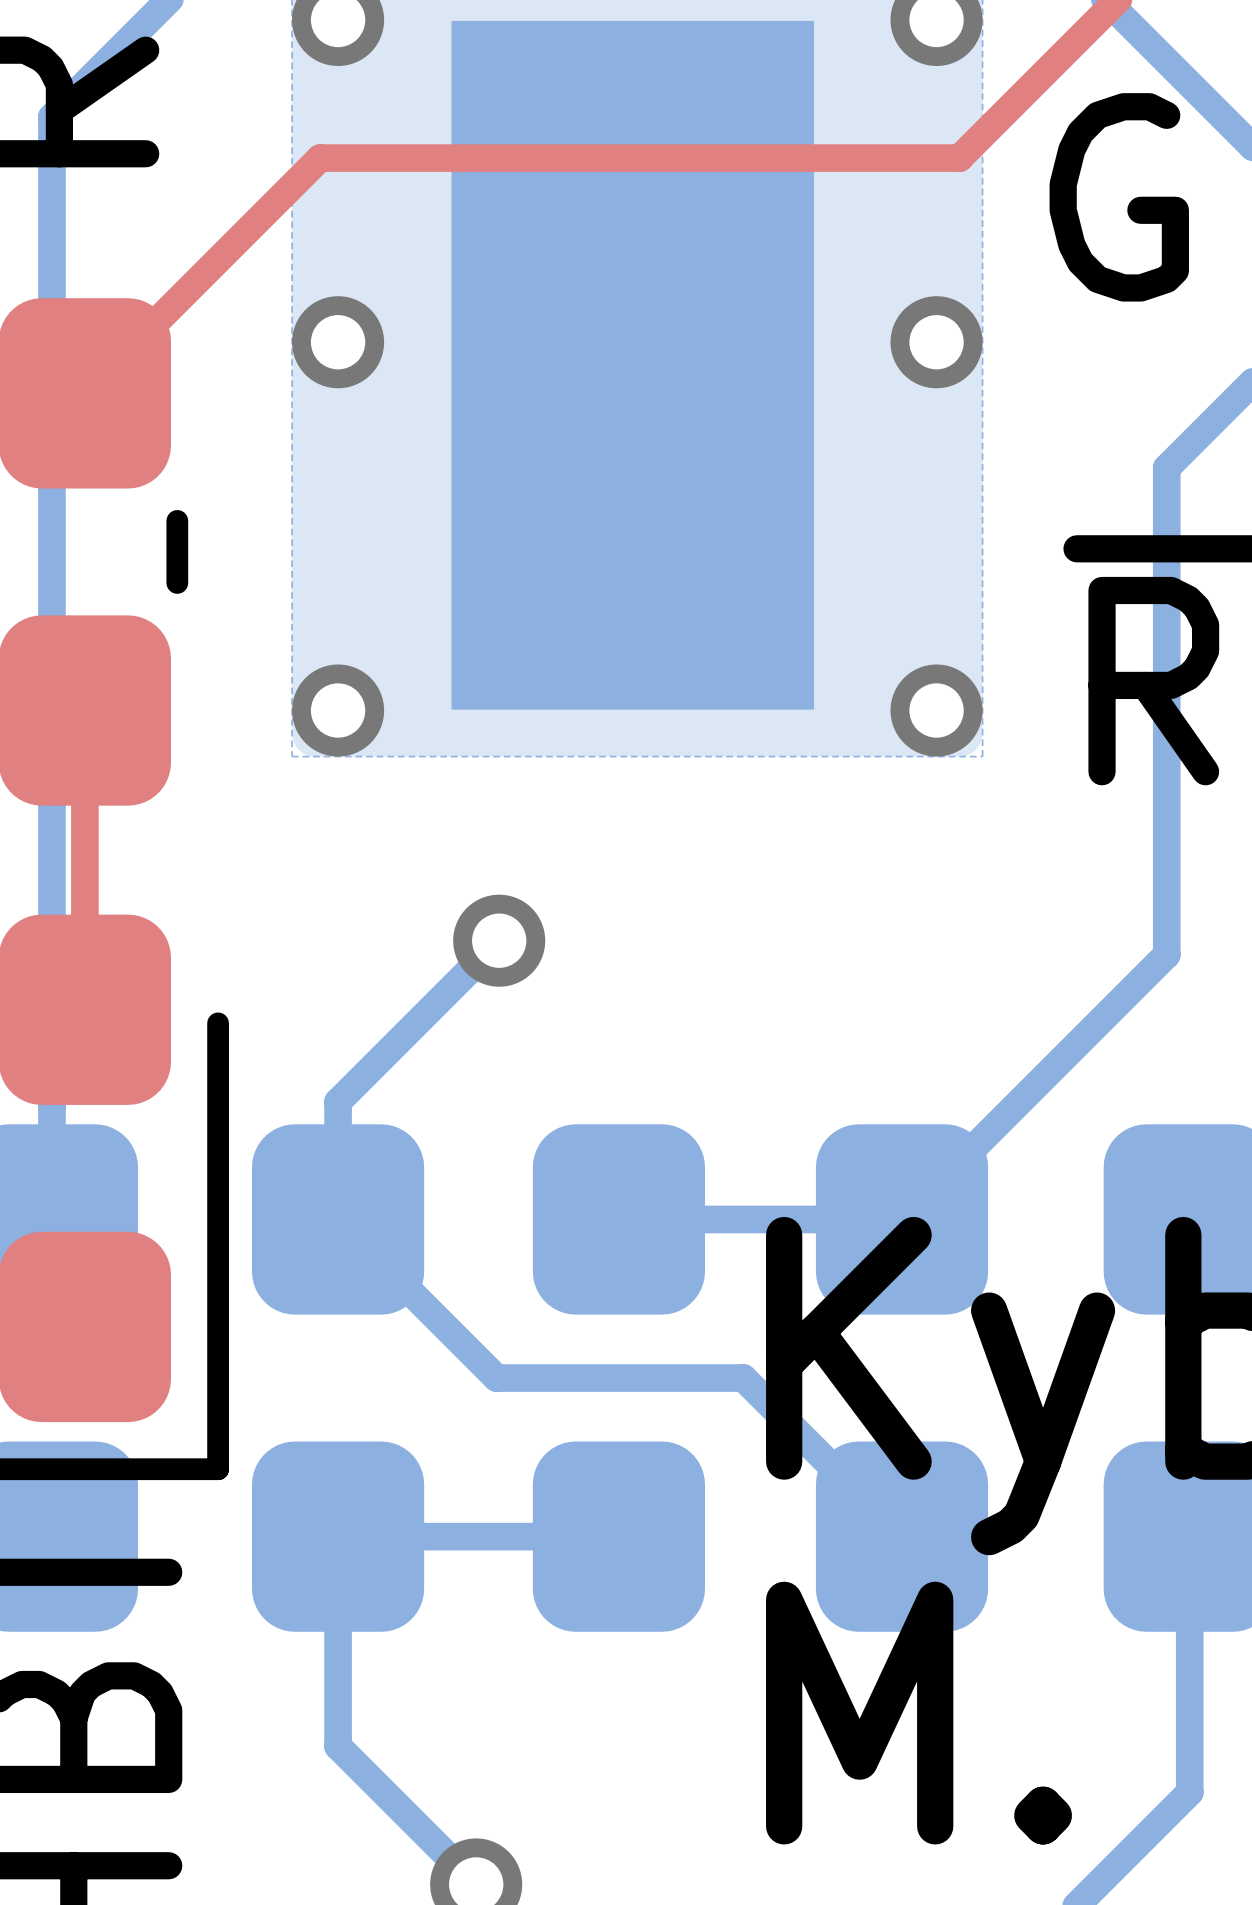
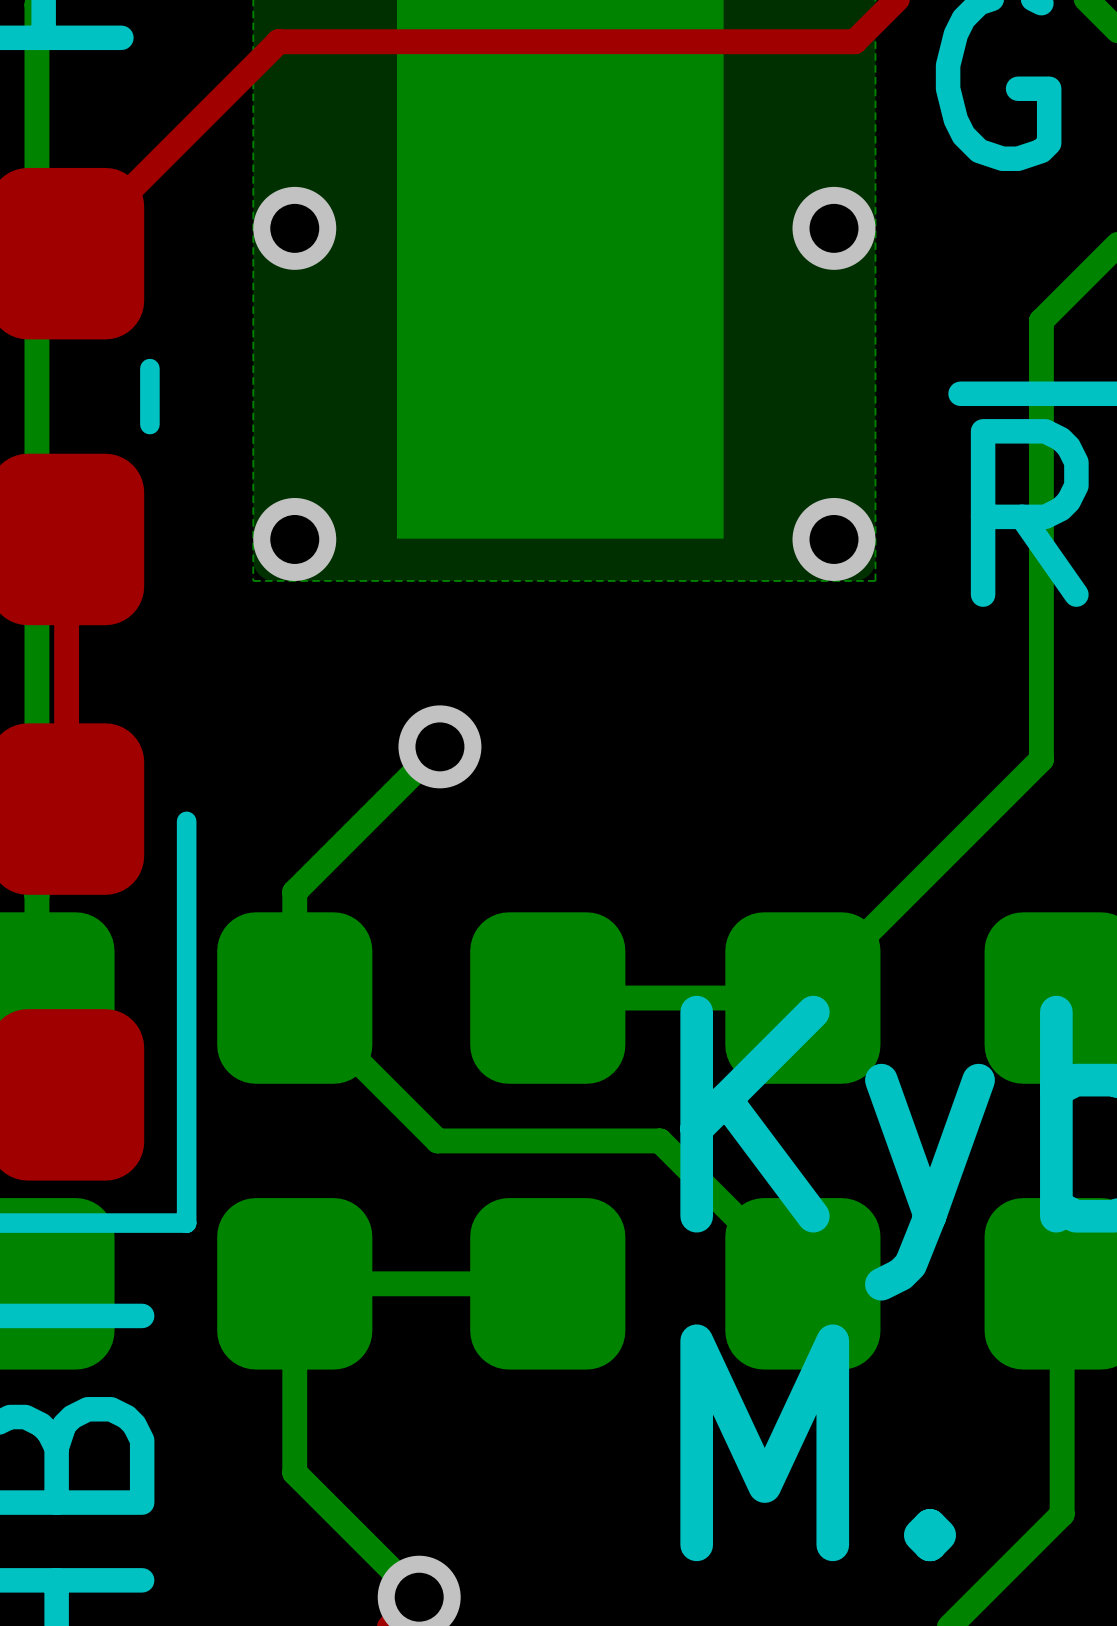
via position: (338, 342) -> (294, 228)
via position: (936, 342) -> (834, 228)

